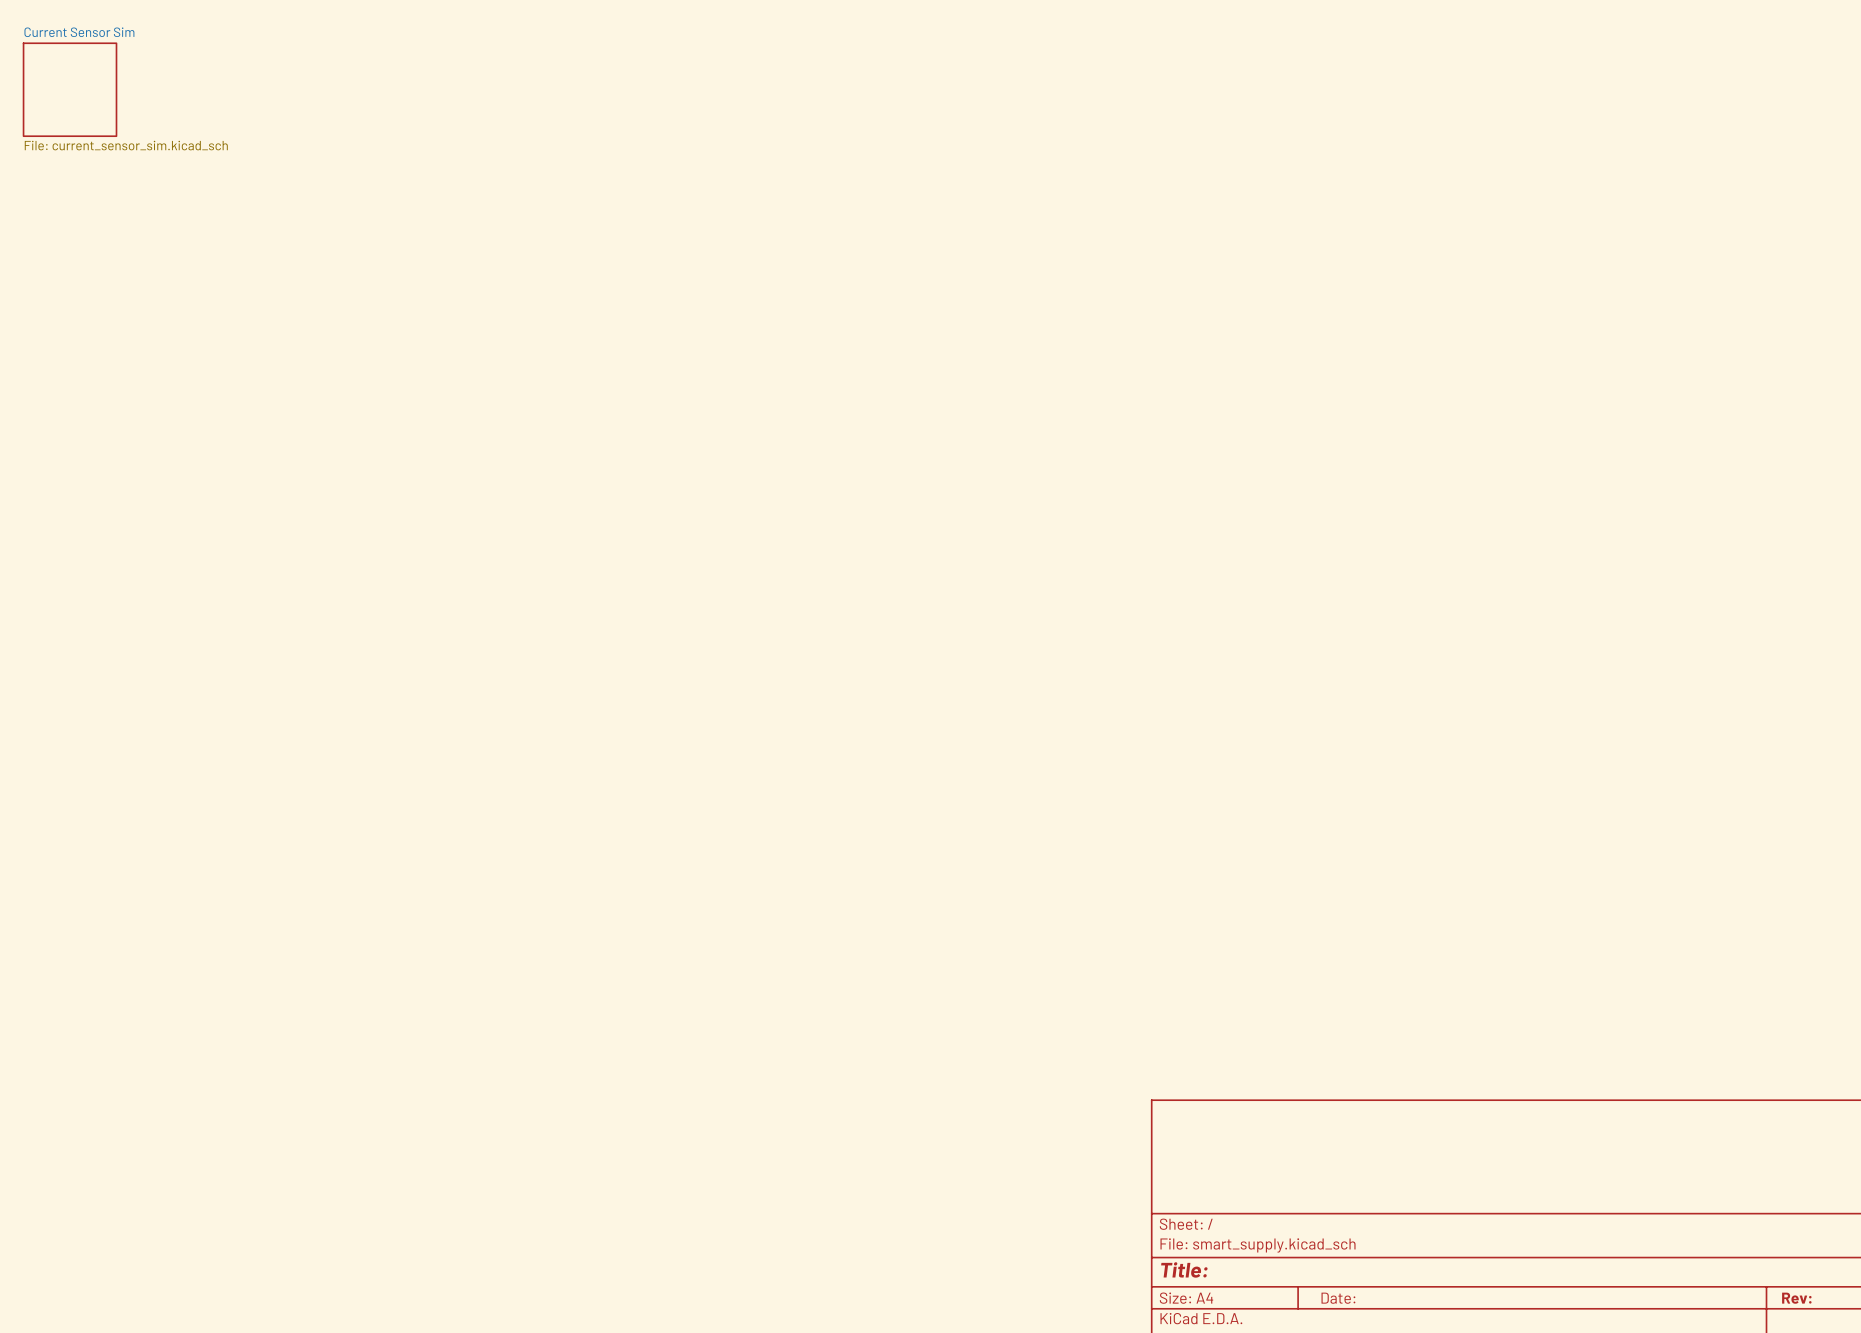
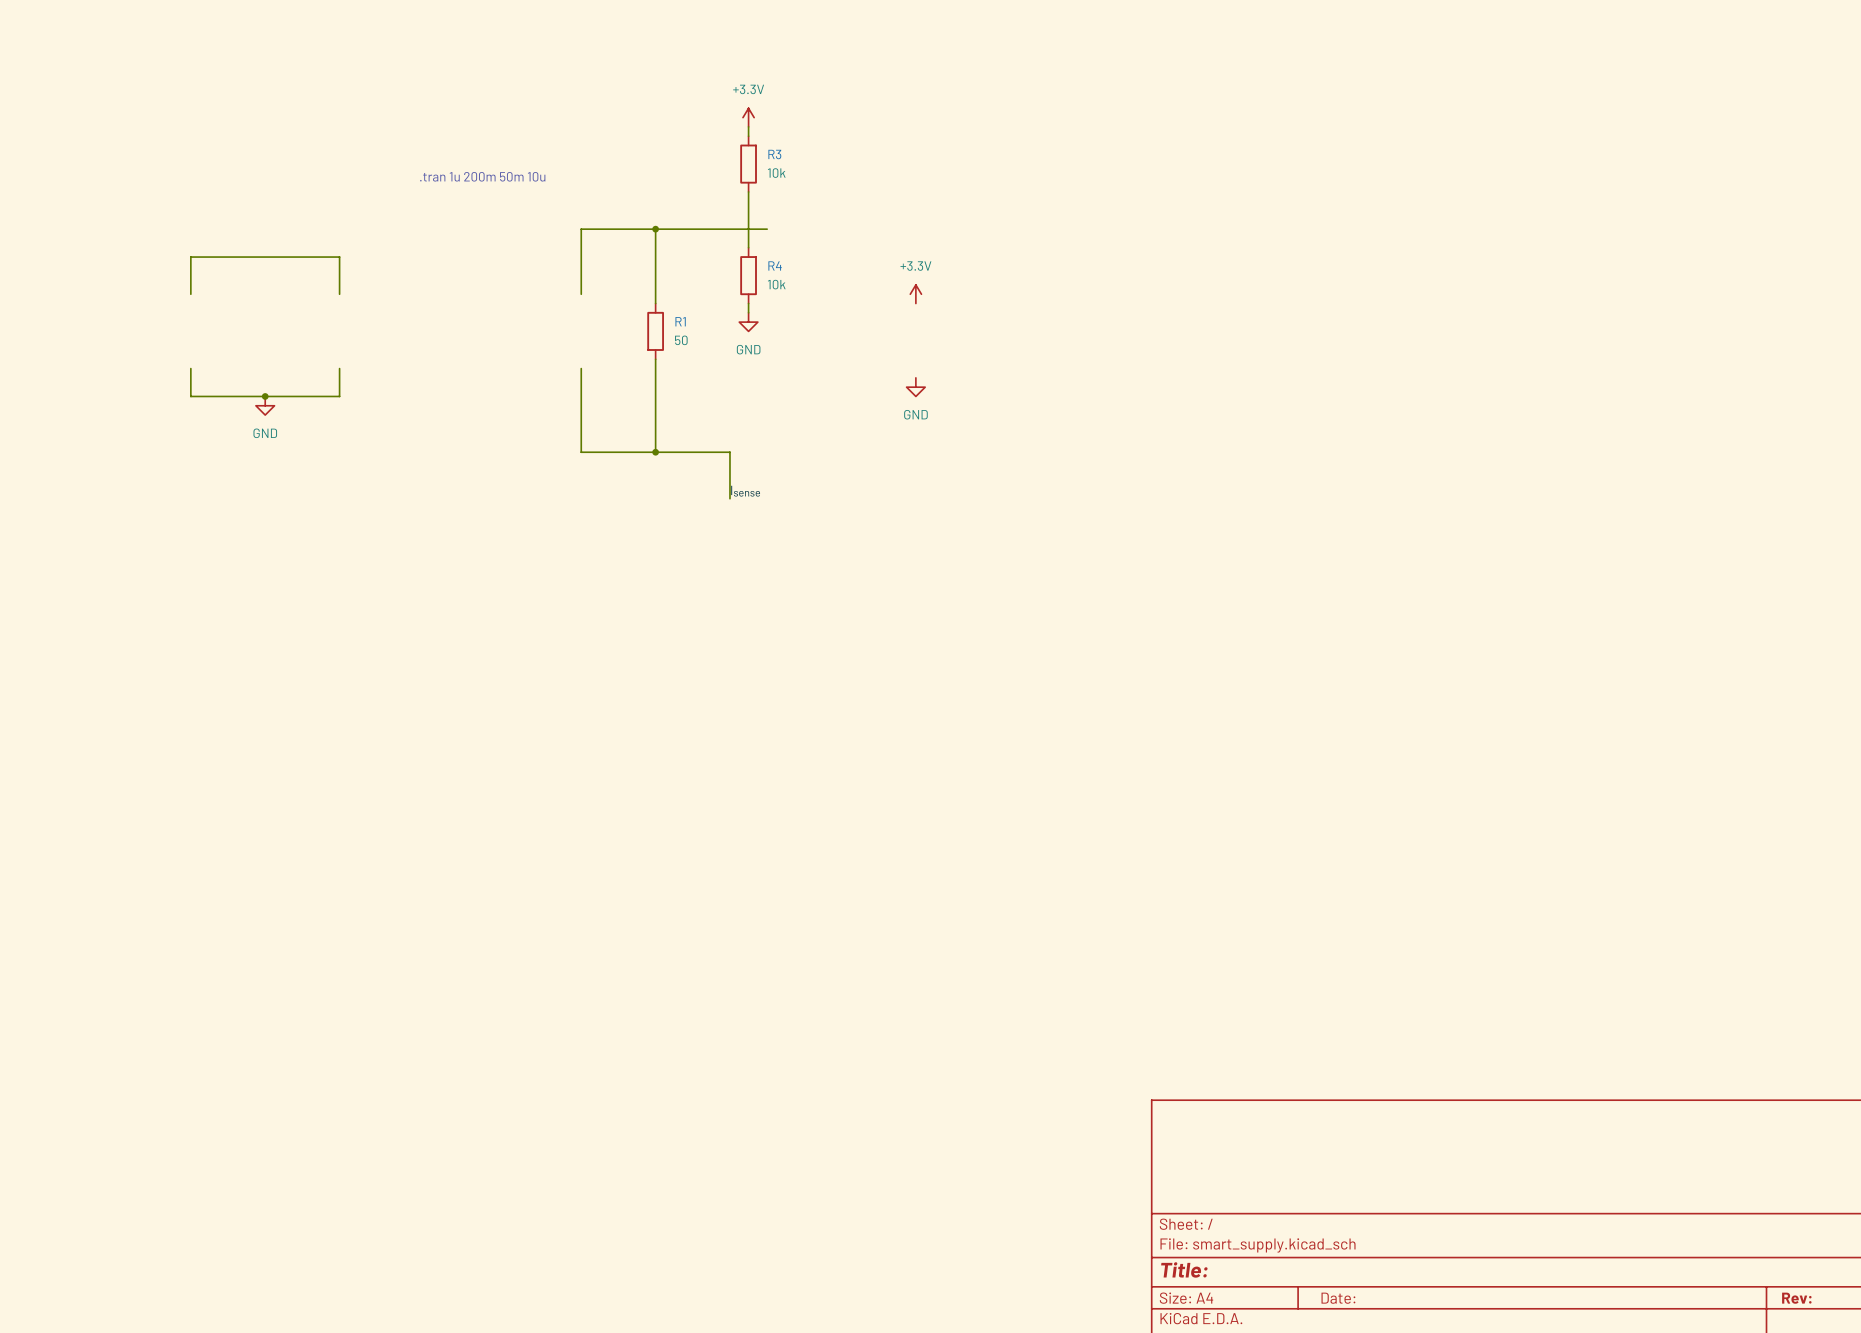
sheet Current Sensor Sim: File: current_sensor_sim.kicad_sch (70, 89) -> none
power symbol: none -> +3.3V (748, 117)
wire: none -> (748, 126) (748, 136)
R3: none -> 10k (748, 164)
text: none -> .tran 1u 200m 50m 10u (482, 176)
wire: none -> (748, 191) (748, 247)
wire: none -> (655, 229) (655, 303)
junction: none -> (655, 229)
wire: none -> (767, 229) (581, 229) (581, 294)
R4: none -> 10k (748, 275)
wire: none -> (190, 294) (190, 257) (339, 257) (339, 294)
power symbol: none -> +3.3V (915, 294)
wire: none -> (748, 303) (748, 312)
power symbol: none -> GND (748, 322)
R1: none -> 50 (655, 331)
wire: none -> (655, 359) (655, 452)
wire: none -> (190, 368) (190, 396) (339, 396) (339, 368)
wire: none -> (581, 368) (581, 452) (729, 452) (729, 498)
power symbol: none -> GND (915, 387)
junction: none -> (265, 396)
power symbol: none -> GND (265, 405)
junction: none -> (655, 452)
label: none -> Isense (745, 491)

